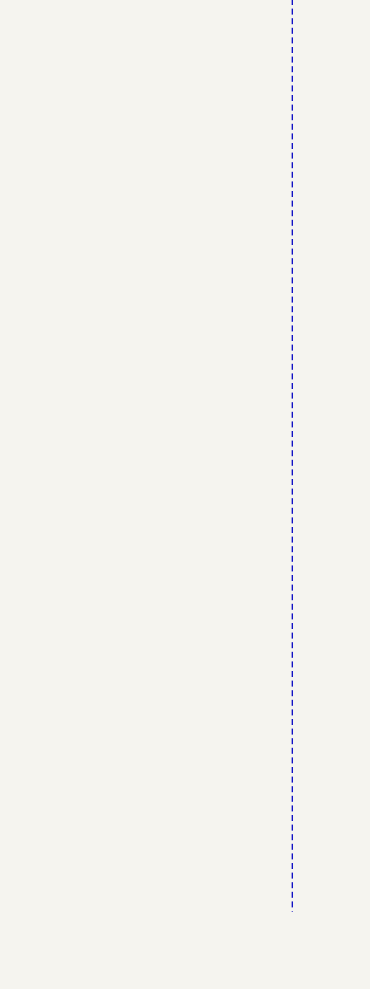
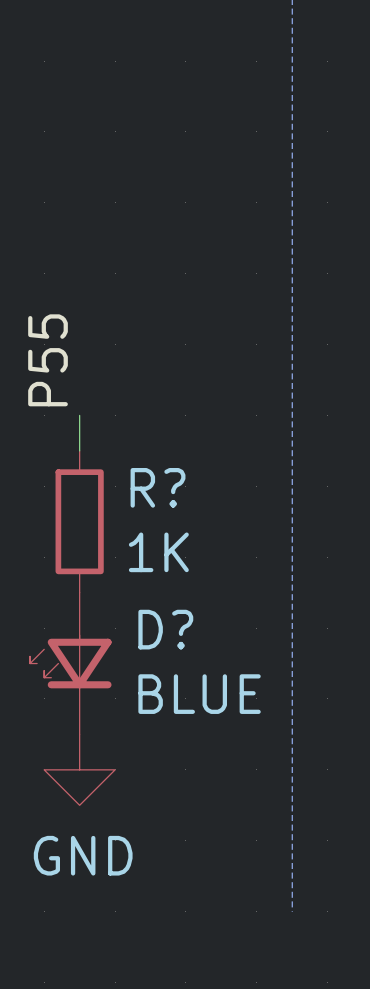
label: none -> P55 (48, 360)
wire: none -> (79, 415) (79, 450)
R?: none -> 1K (79, 521)
D?: none -> BLUE (70, 663)
power symbol: none -> GND (79, 769)

